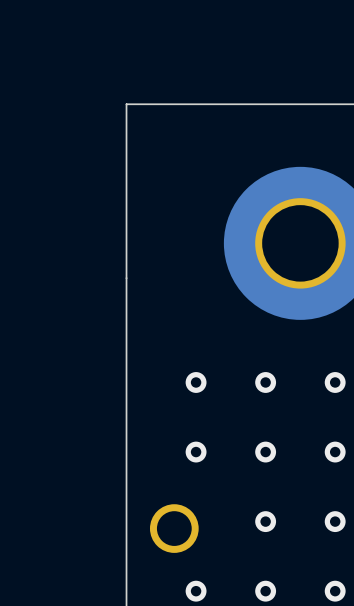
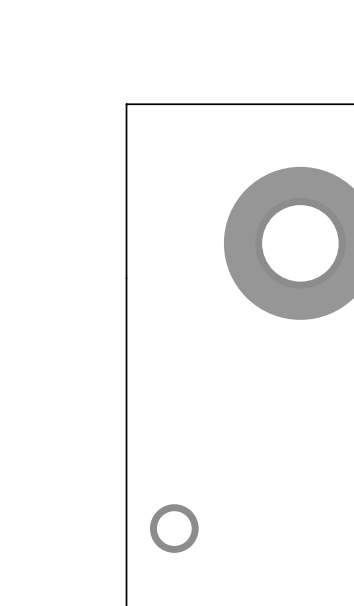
via: (196, 382) -> none
via: (265, 382) -> none
via: (335, 382) -> none
via: (196, 452) -> none
via: (265, 452) -> none
via: (335, 452) -> none
via: (265, 521) -> none
via: (335, 521) -> none
via: (196, 591) -> none
via: (265, 591) -> none
via: (335, 591) -> none

